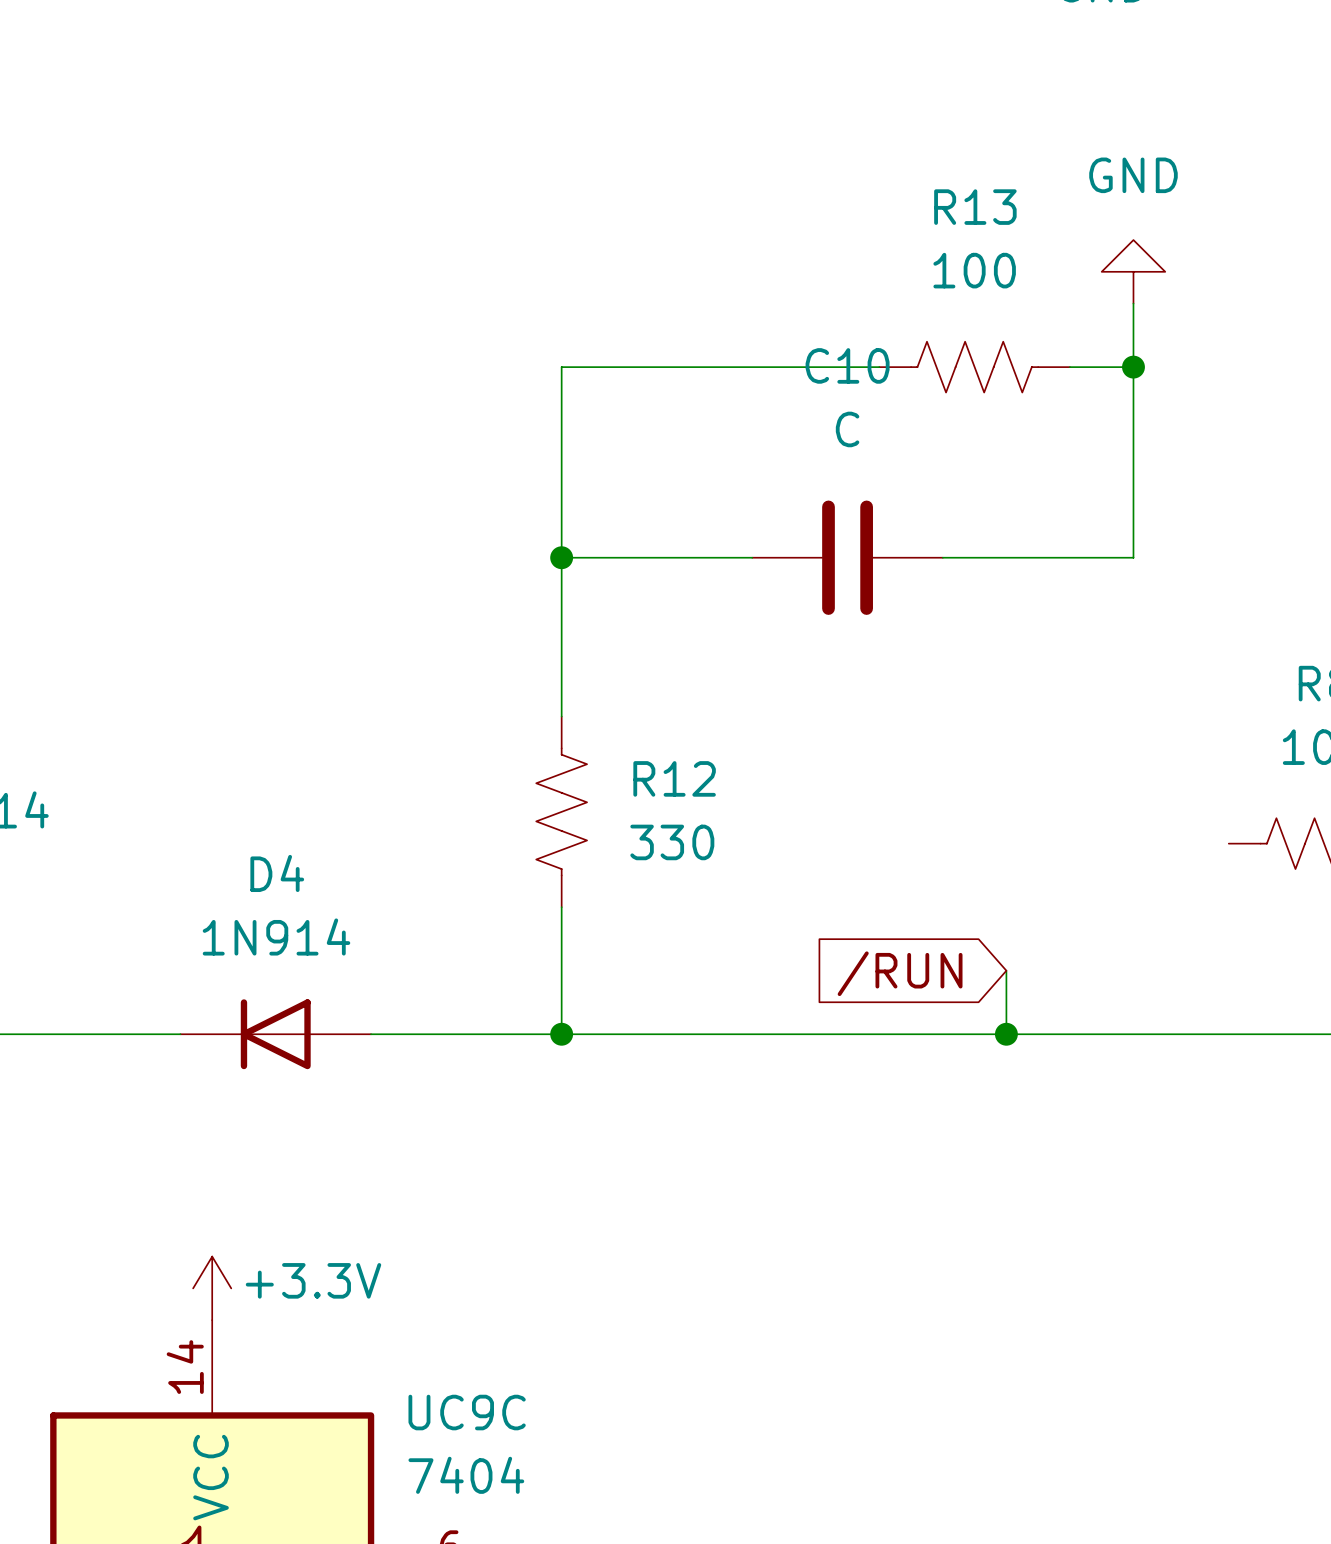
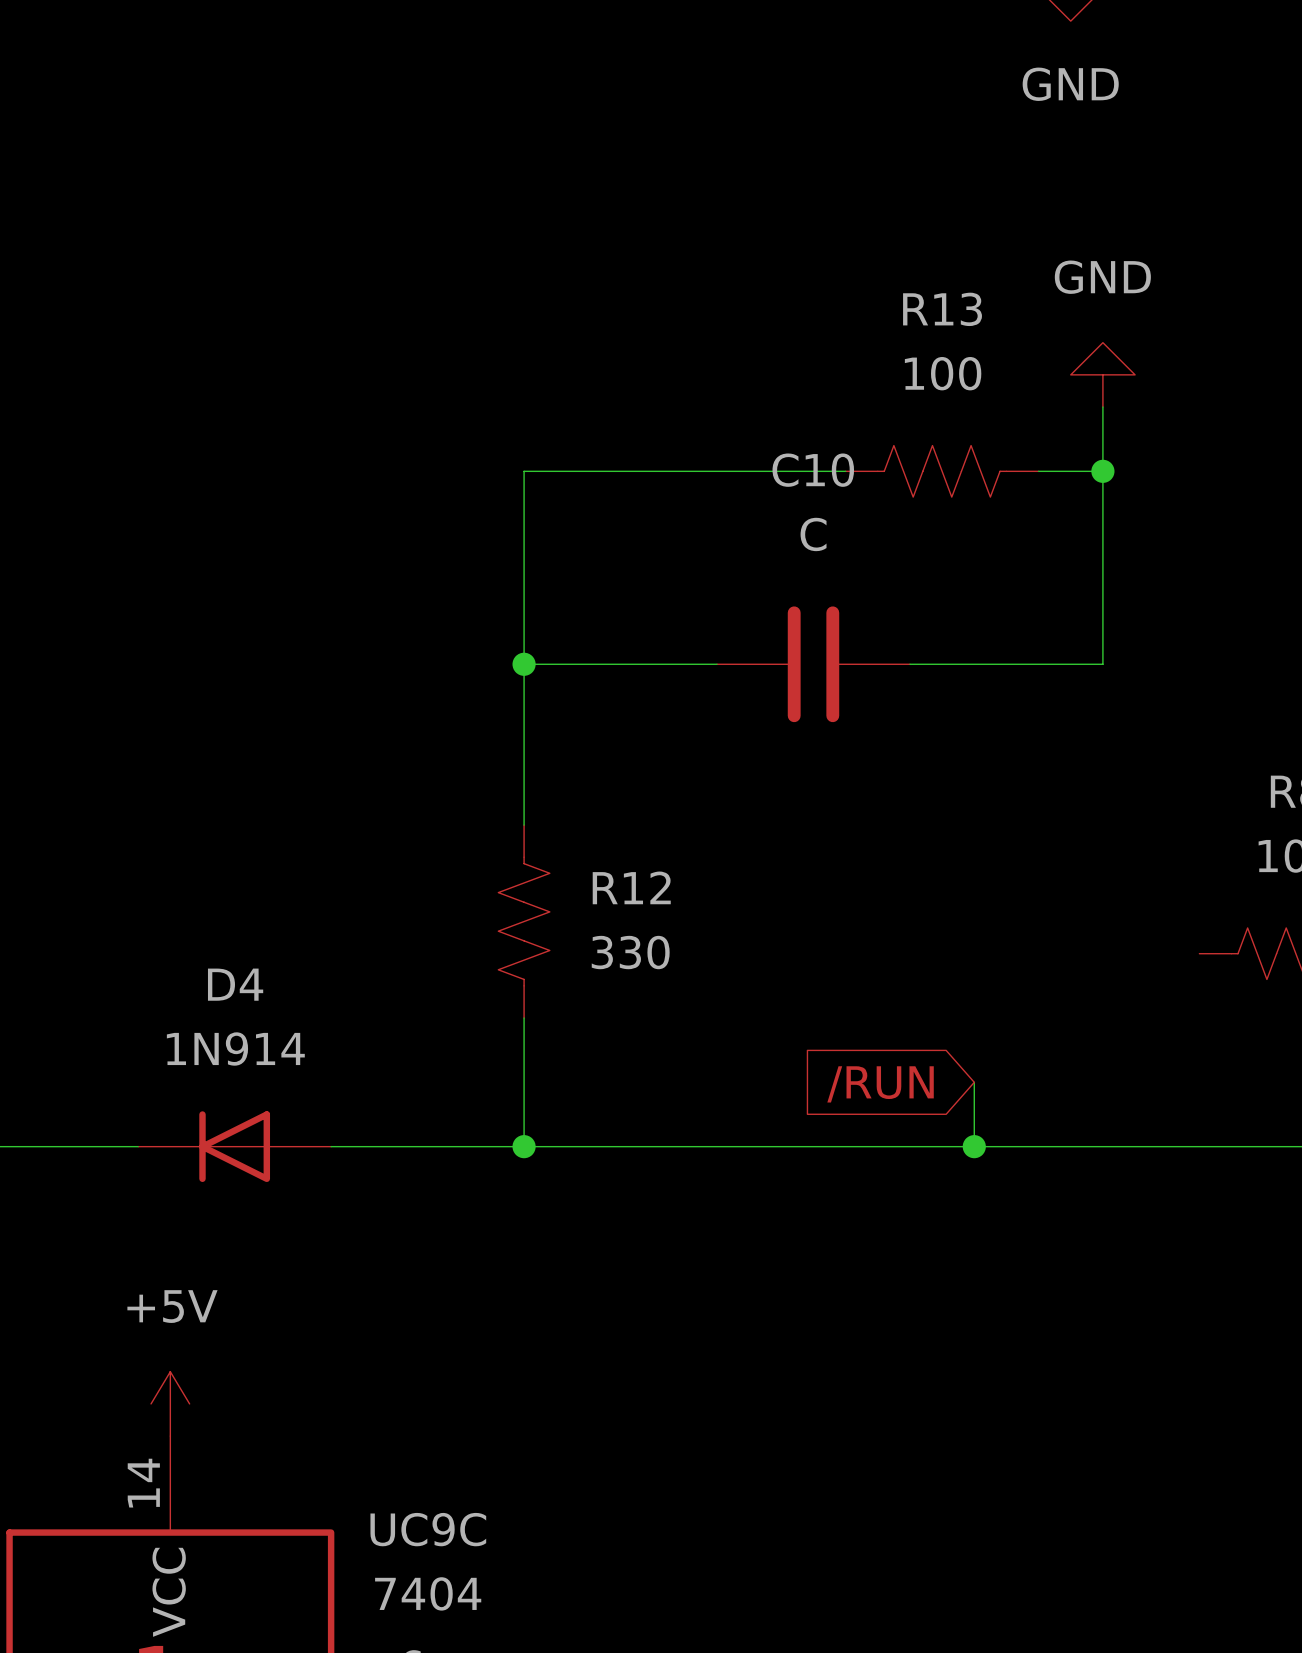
power symbol: +3.3V (212, 1288) -> +5V (170, 1403)

